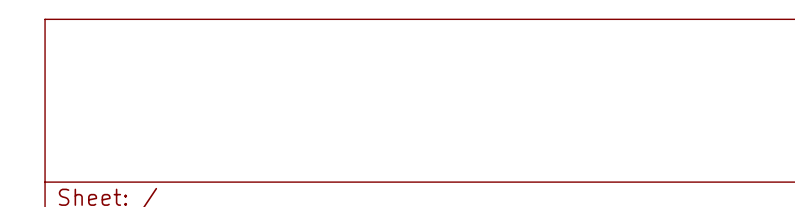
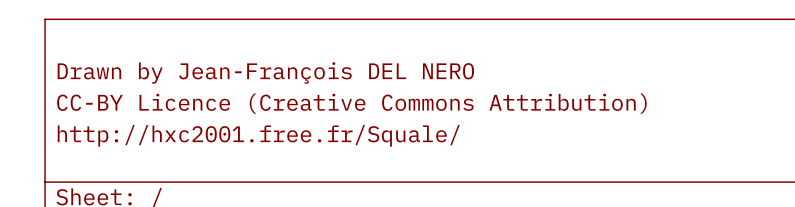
title block: none -> Drawn by Jean-François DEL NERO (265, 73)
title block: none -> CC-BY Licence (Creative Commons Attribution) (351, 103)
title block: none -> http://hxc2001.free.fr/Squale/ (258, 135)

